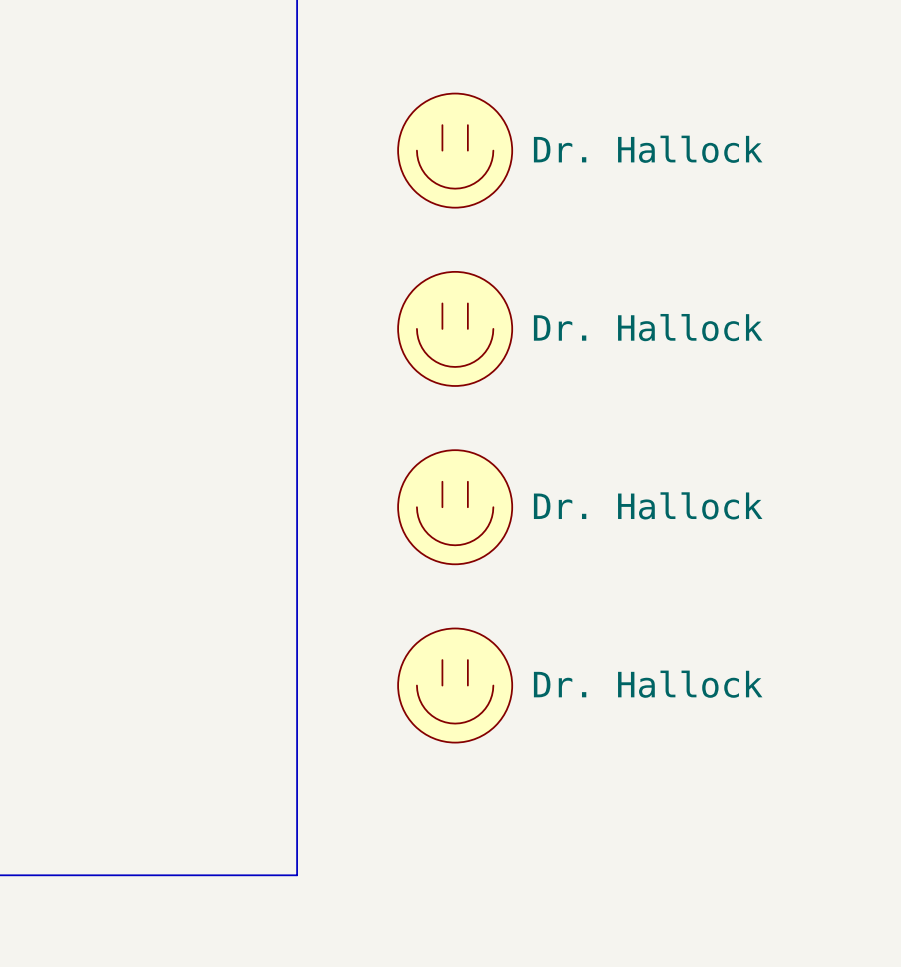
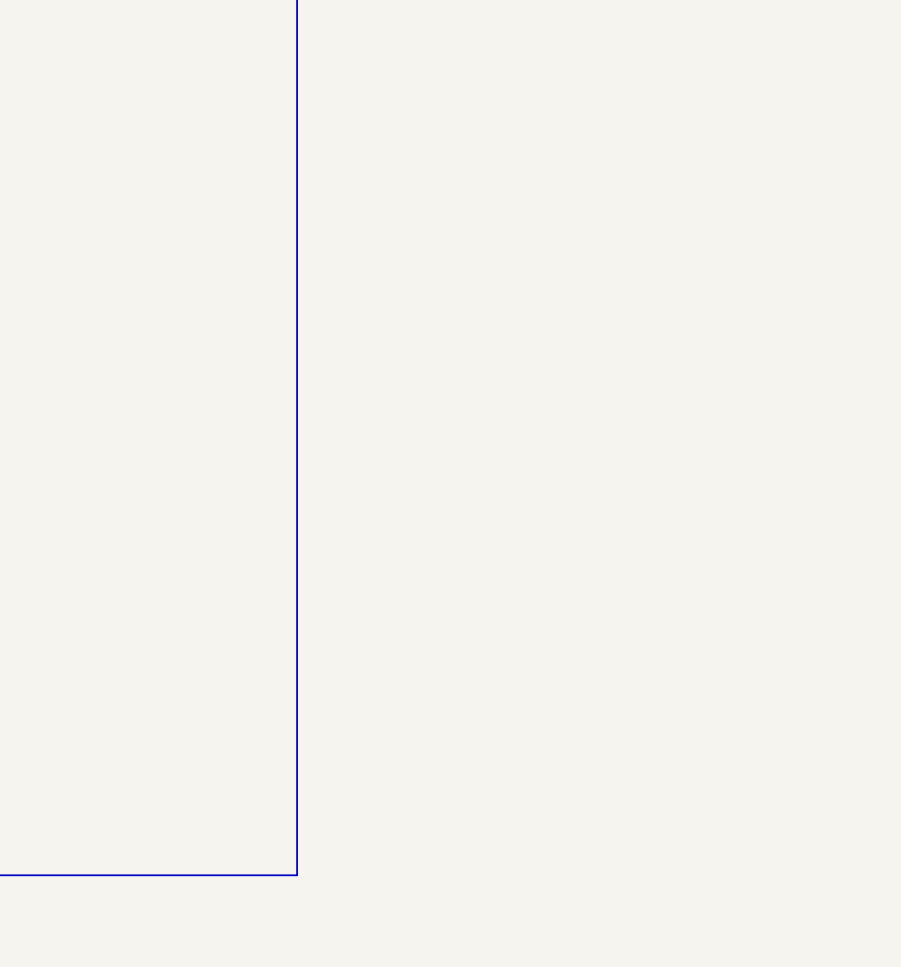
part: Dr. Hallock (455, 150) -> none
part: Dr. Hallock (455, 328) -> none
part: Dr. Hallock (455, 507) -> none
part: Dr. Hallock (455, 685) -> none

